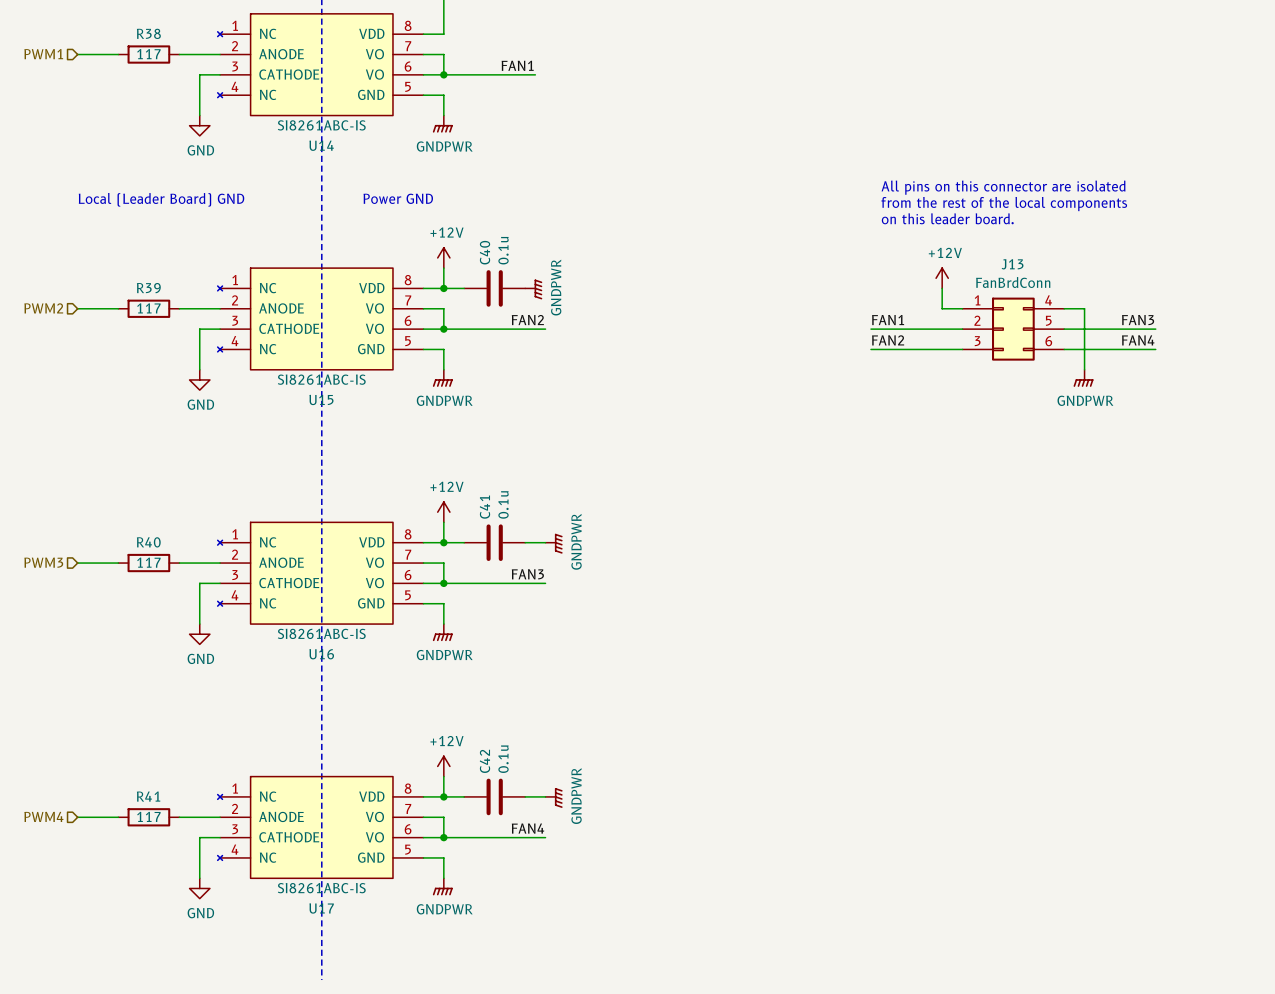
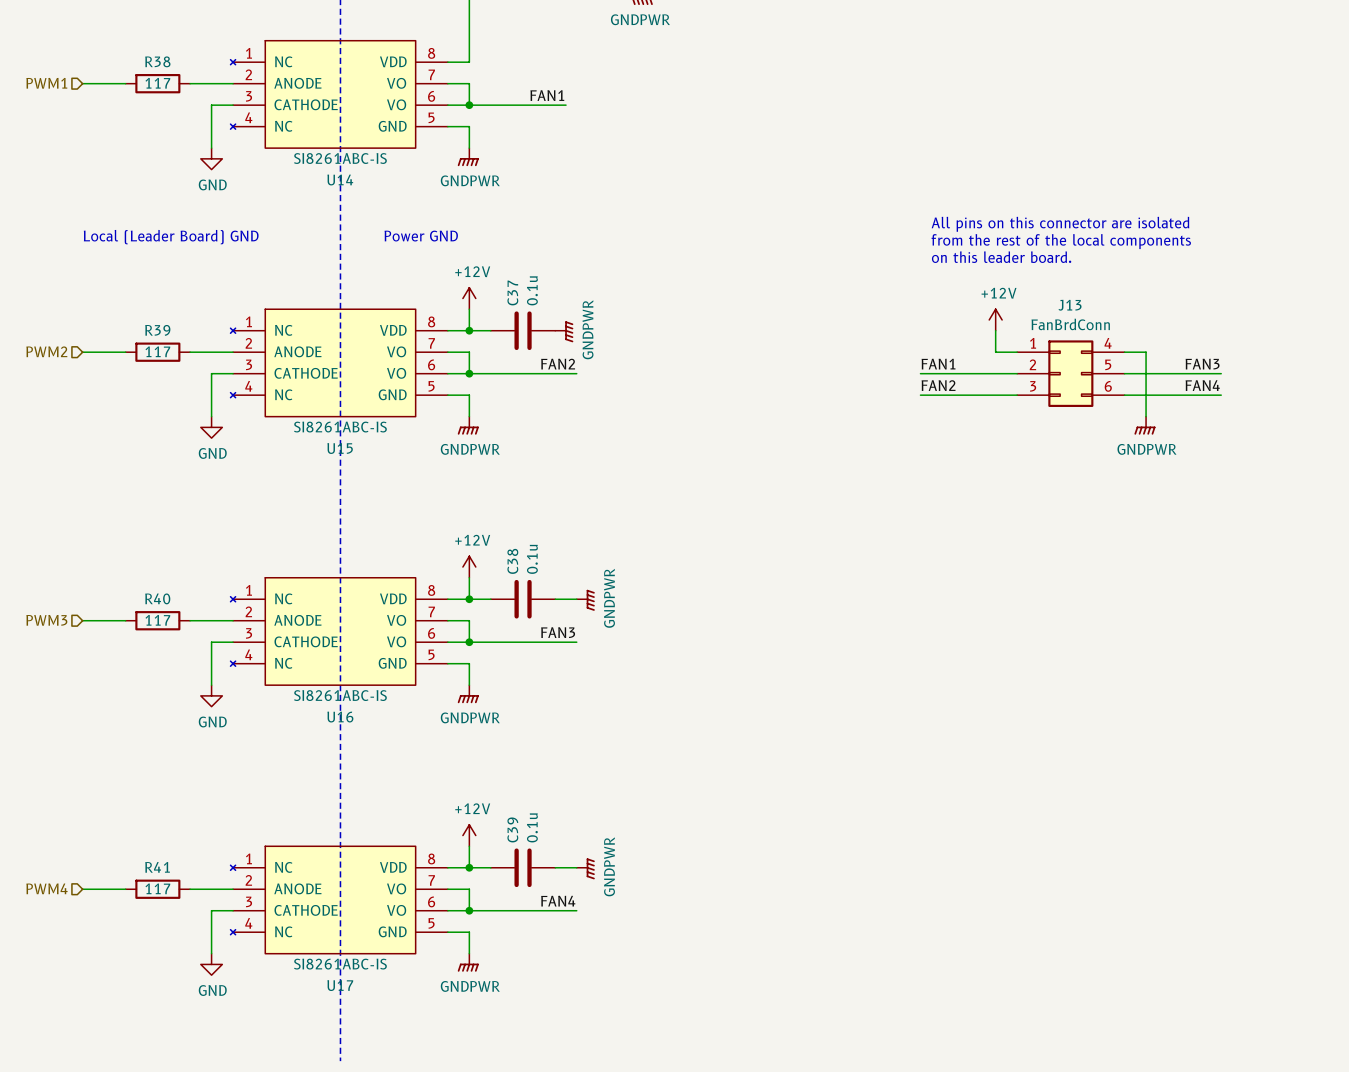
C40 name: C40 (485, 252) -> C37 (512, 292)
C41 name: C41 (485, 507) -> C38 (512, 561)
C42 name: C42 (485, 761) -> C39 (512, 829)

